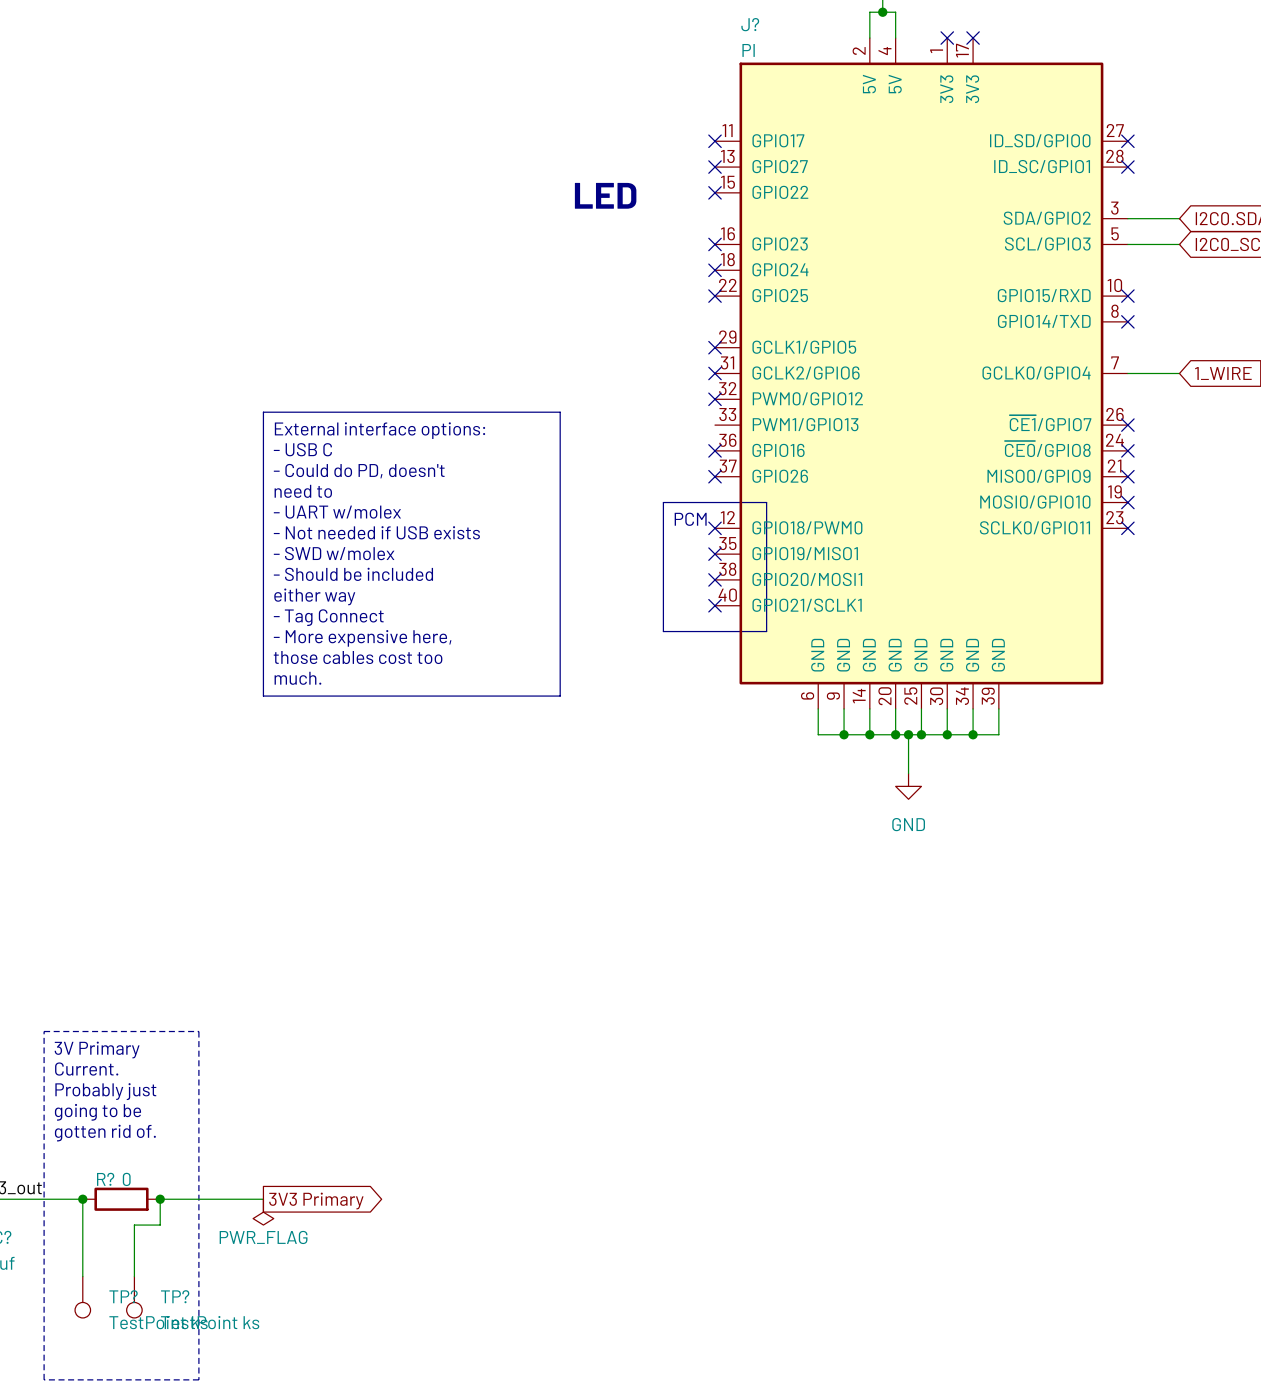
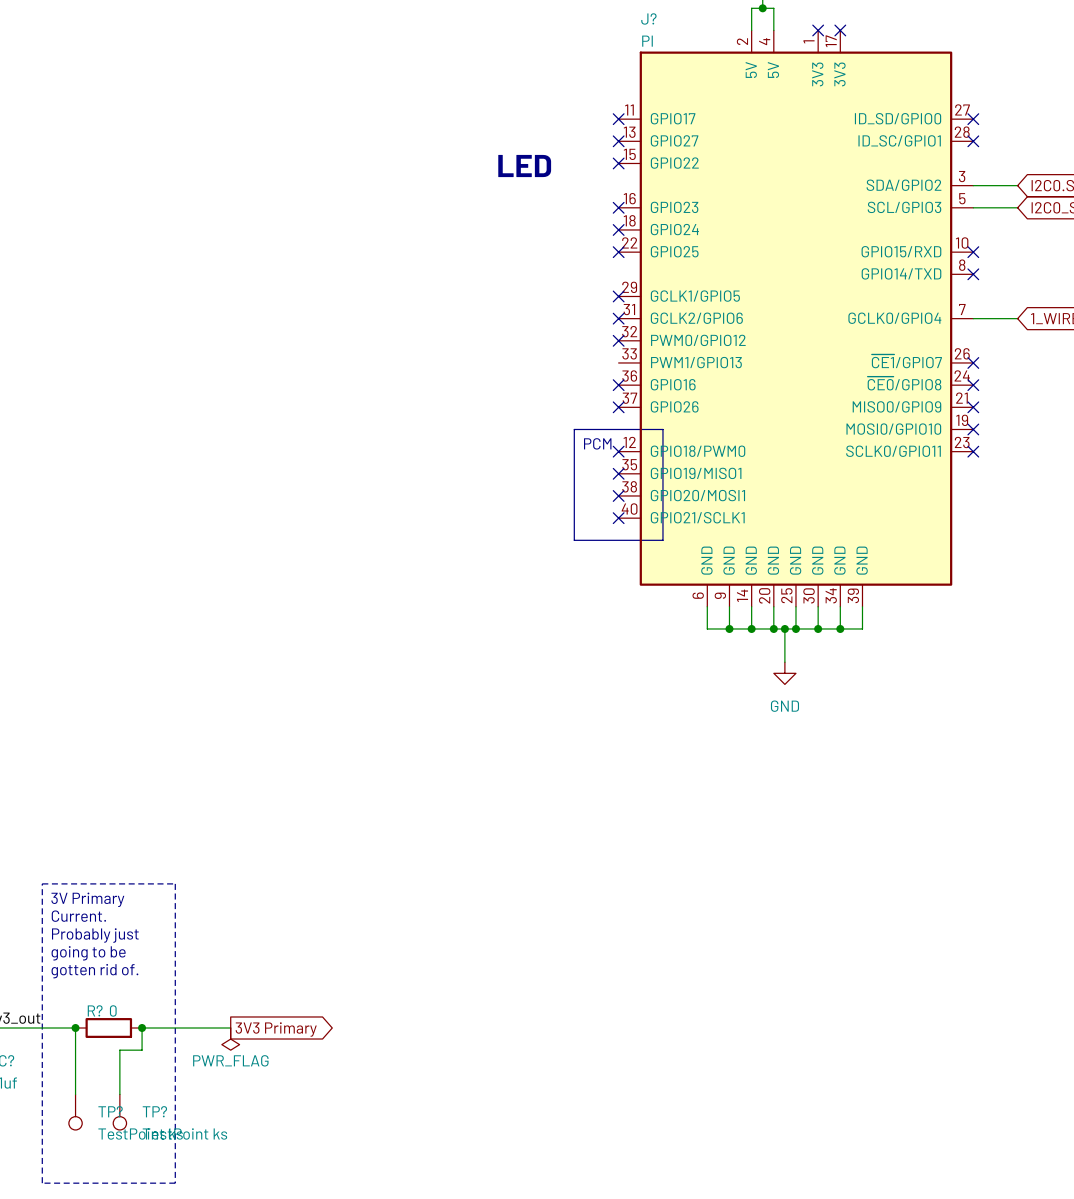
line: (263, 412) (560, 412) (560, 696) (263, 696) (263, 412) -> none
text: External interface options: (379, 430) -> none
text: - USB C (302, 449) -> none
text: - Could do PD, doesn't (359, 471) -> none
text: need to (303, 491) -> none
text: - UART w/molex (337, 512) -> none
text: - Not needed if USB exists (376, 532) -> none
text: - SWD w/molex (334, 553) -> none
text: - Should be included (353, 574) -> none
text: either way (314, 596) -> none
text: - Tag Connect (328, 617) -> none
text: - More expensive here, (362, 638) -> none
text: those cables cost too (358, 657) -> none
text: much. (297, 678) -> none

